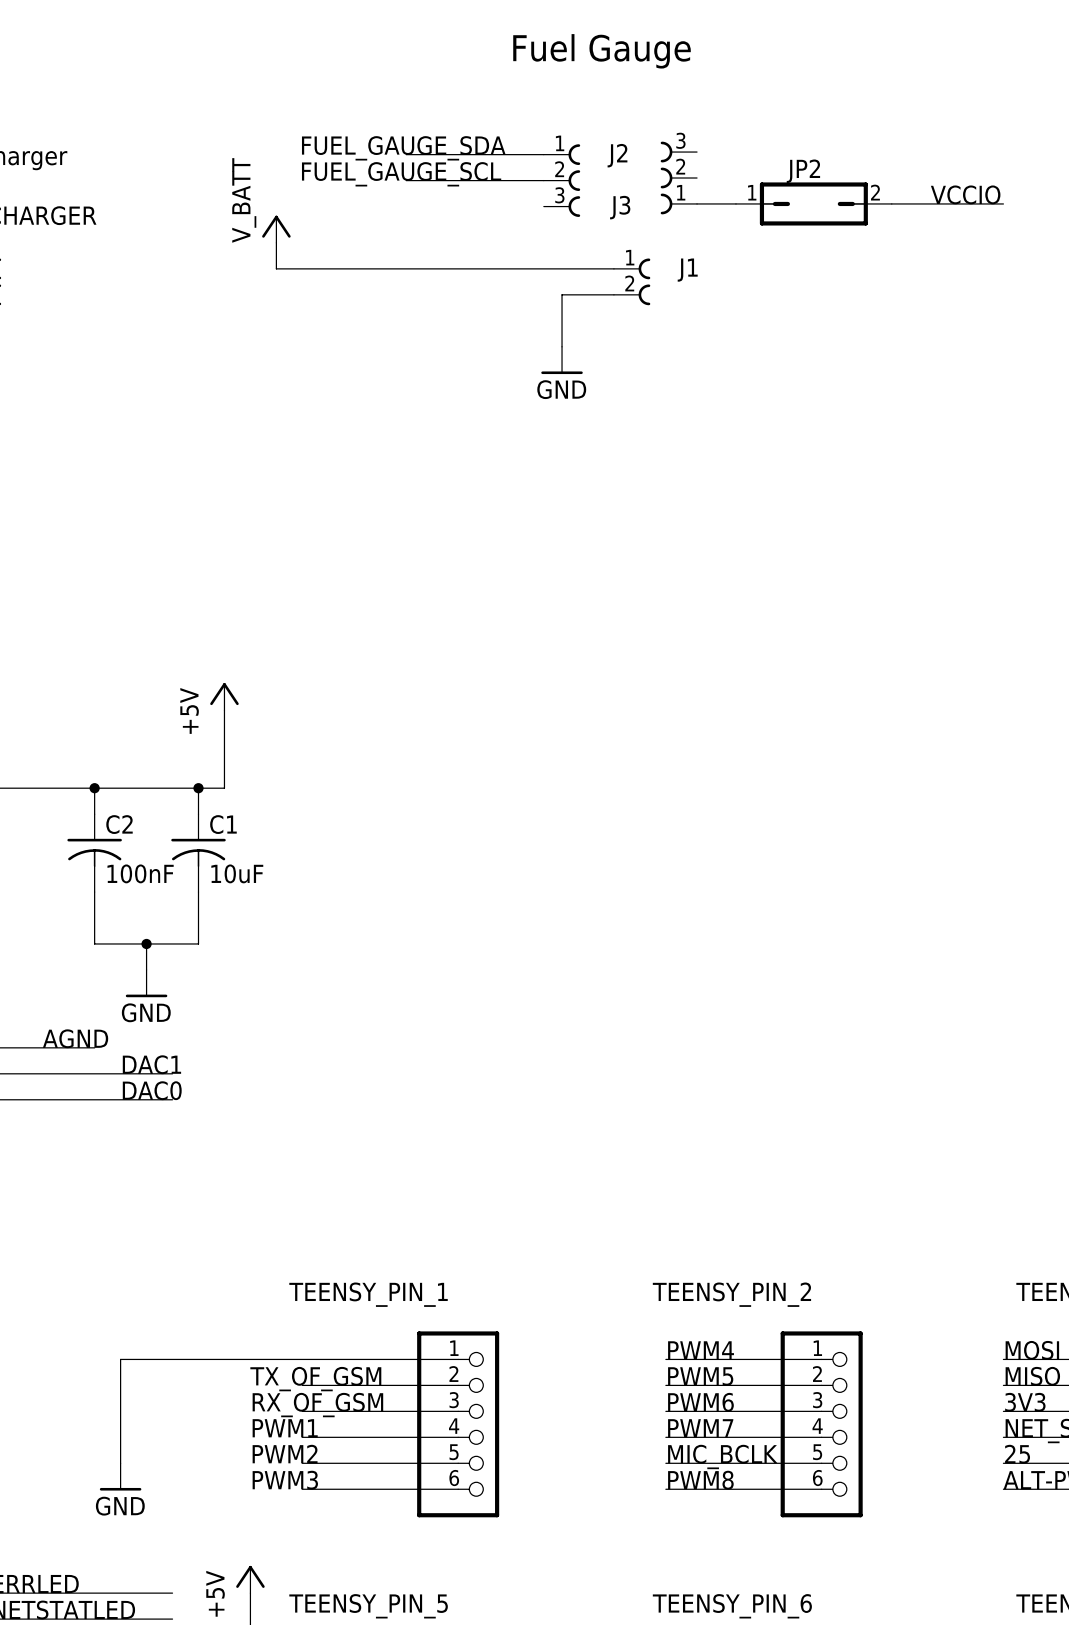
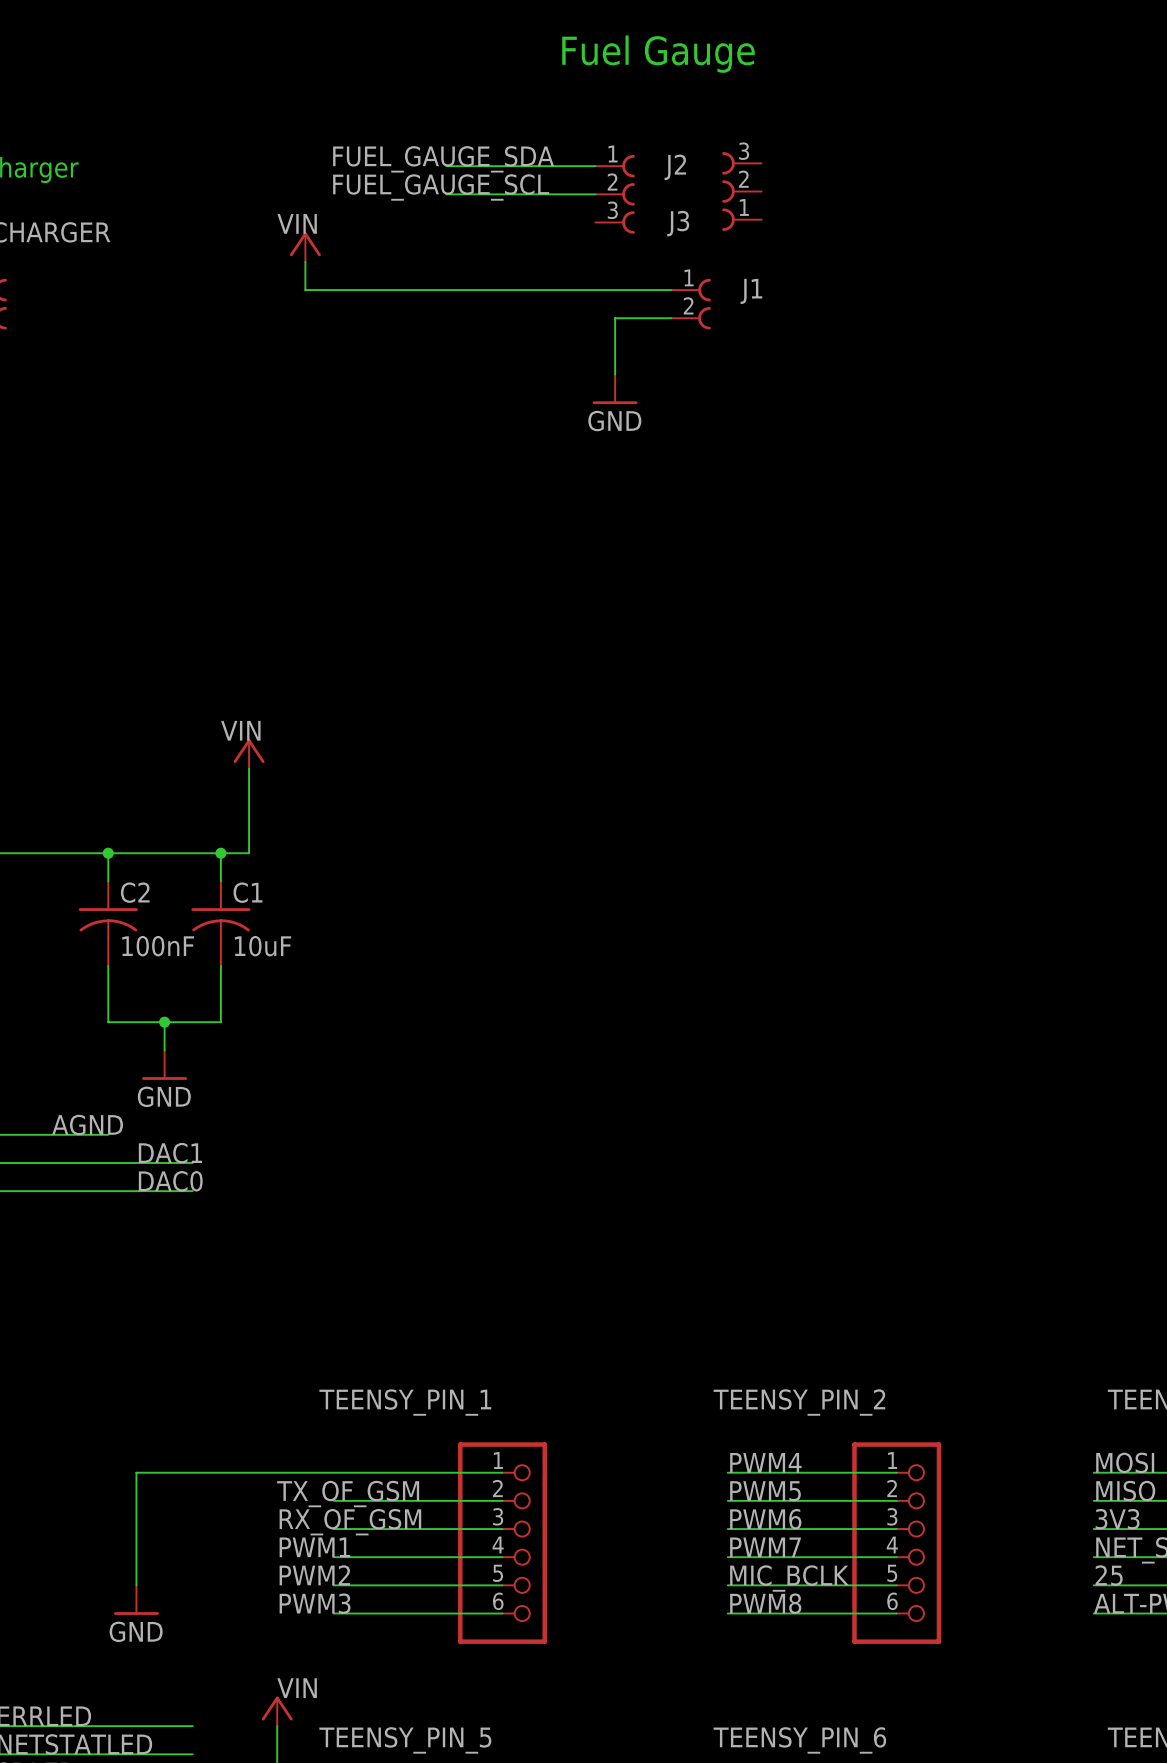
label: VCCIO (965, 194) -> none
power symbol text: V_BATT (244, 200) -> none
wire: (697, 203) (735, 203) -> none
JP2: (813, 203) -> none
wire: (891, 203) (1003, 203) -> none
label: none -> VIN (297, 223)
label: none -> VIN (240, 730)
power symbol text: +5V (189, 710) -> none
label: none -> VIN (297, 1688)
power symbol text: +5V (215, 1593) -> none

